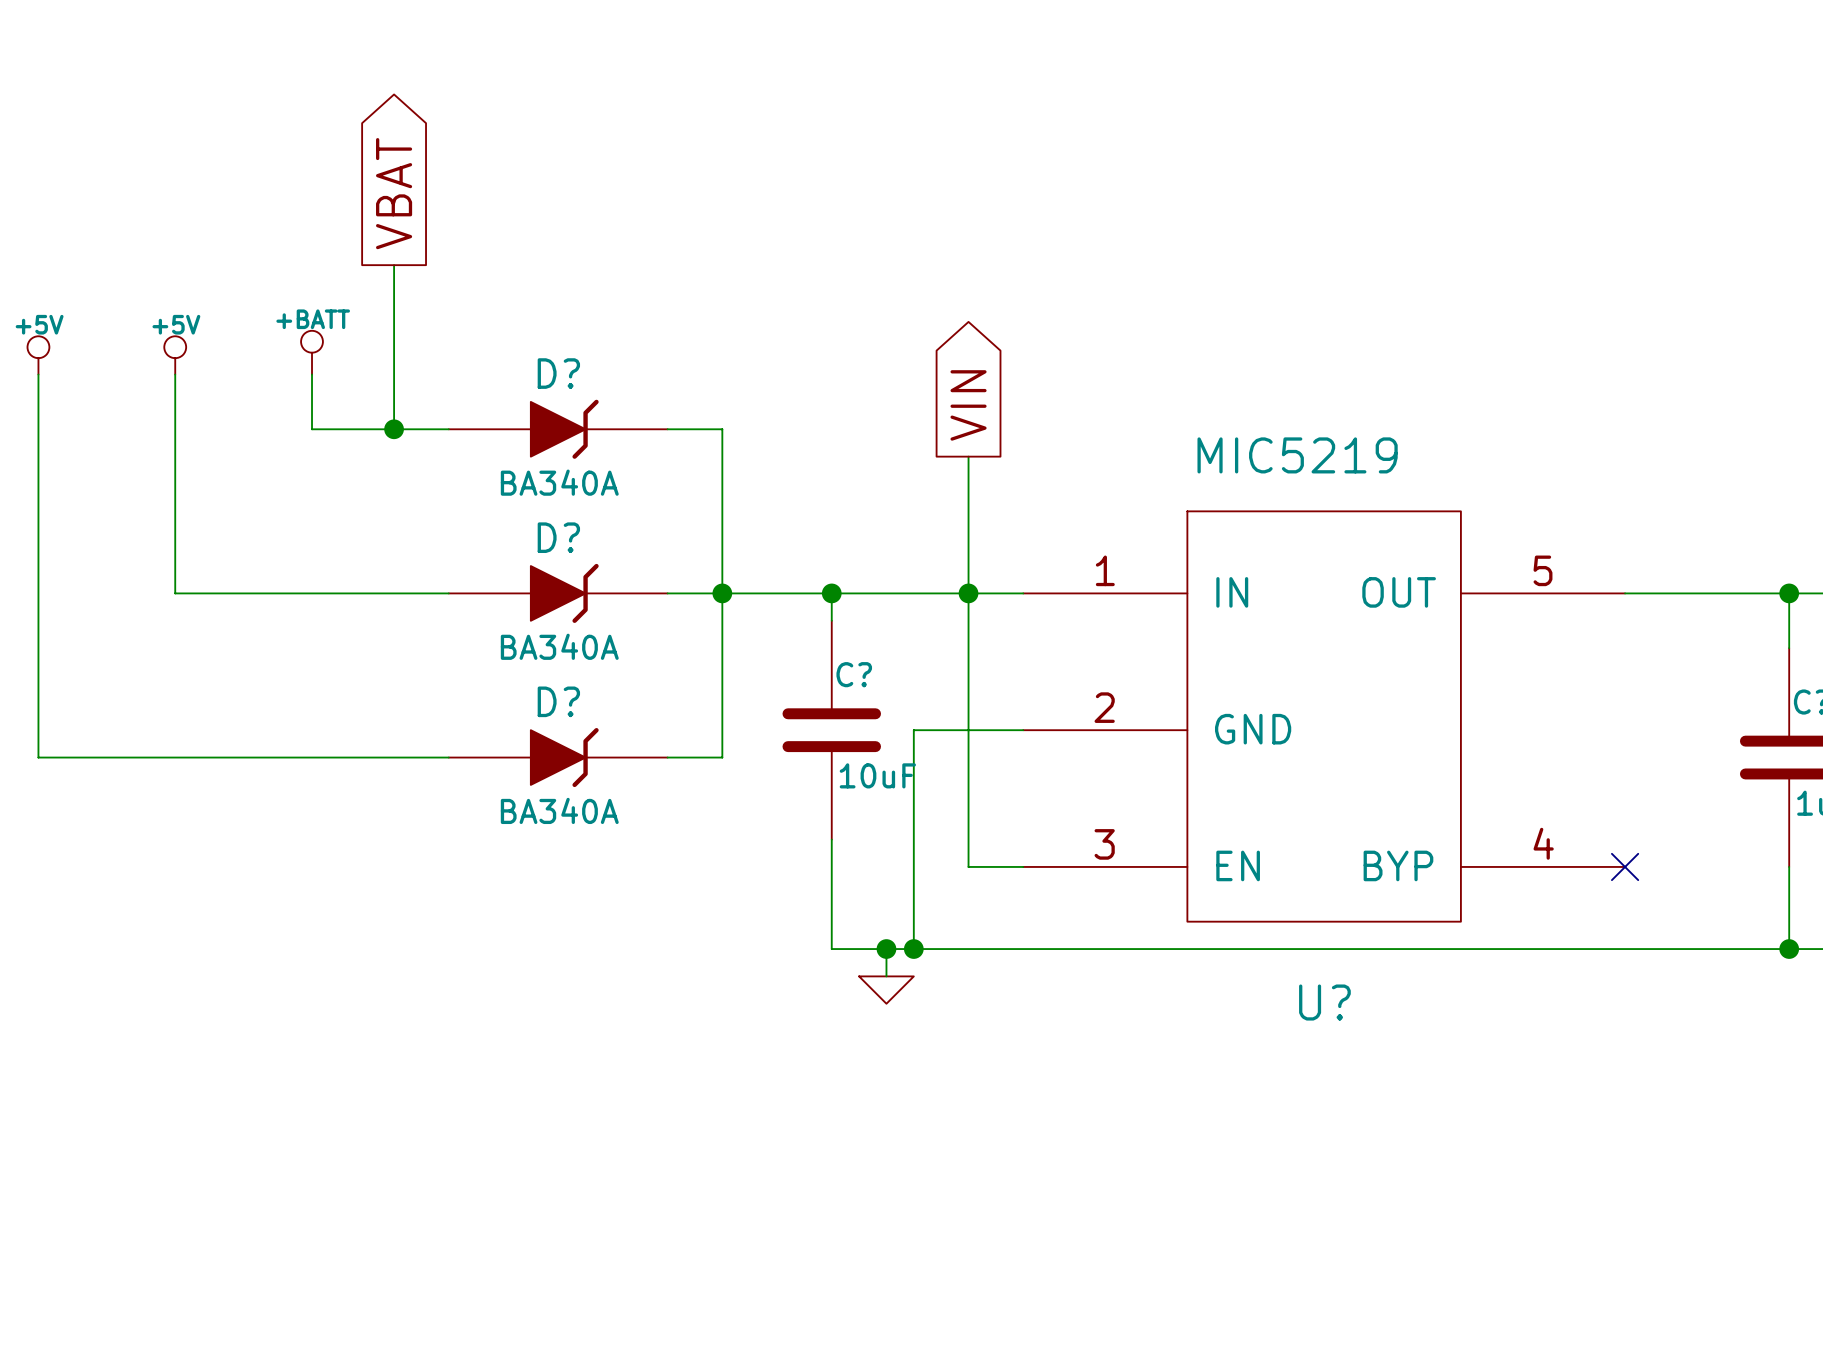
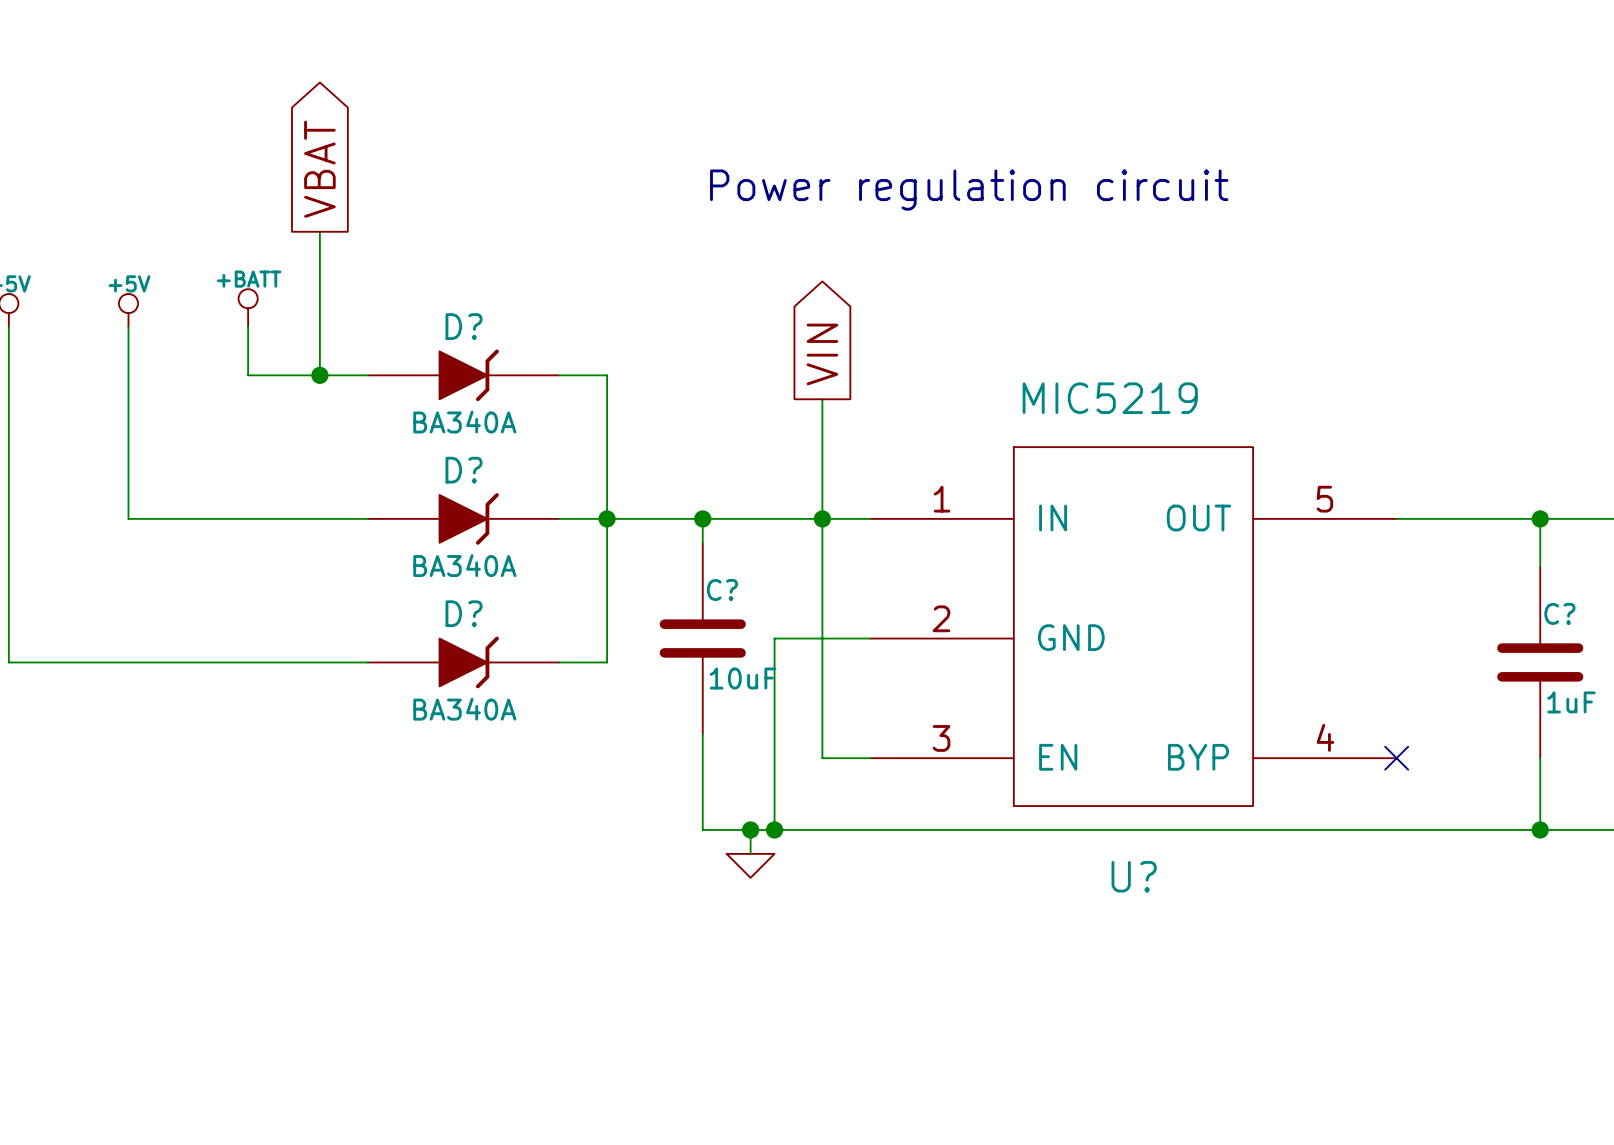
text: none -> Power regulation circuit (969, 190)

